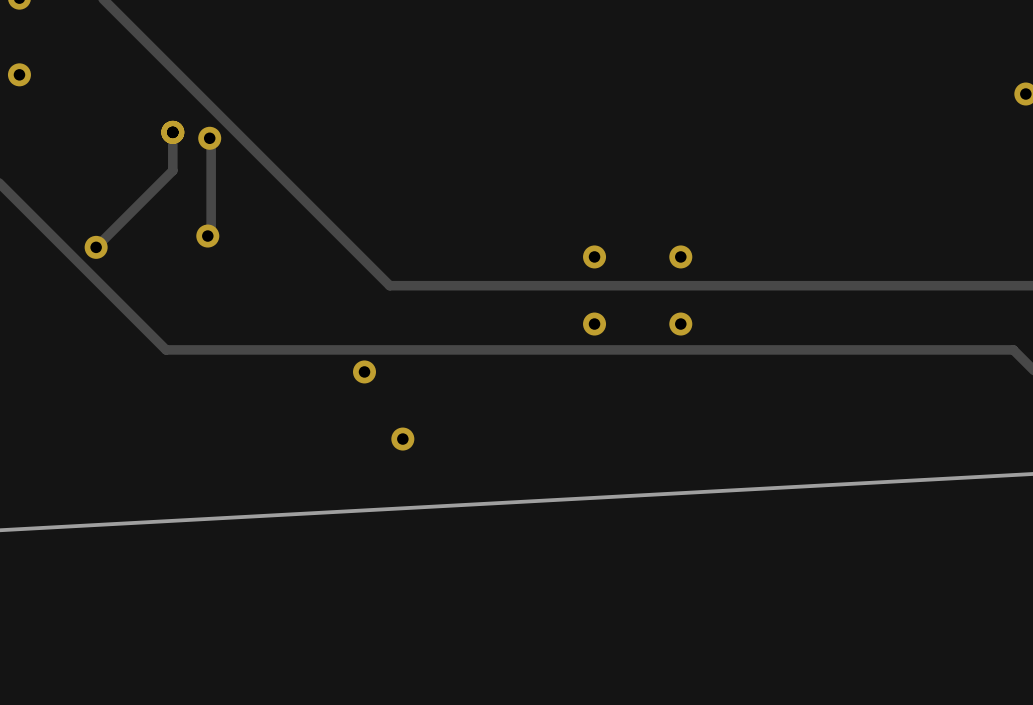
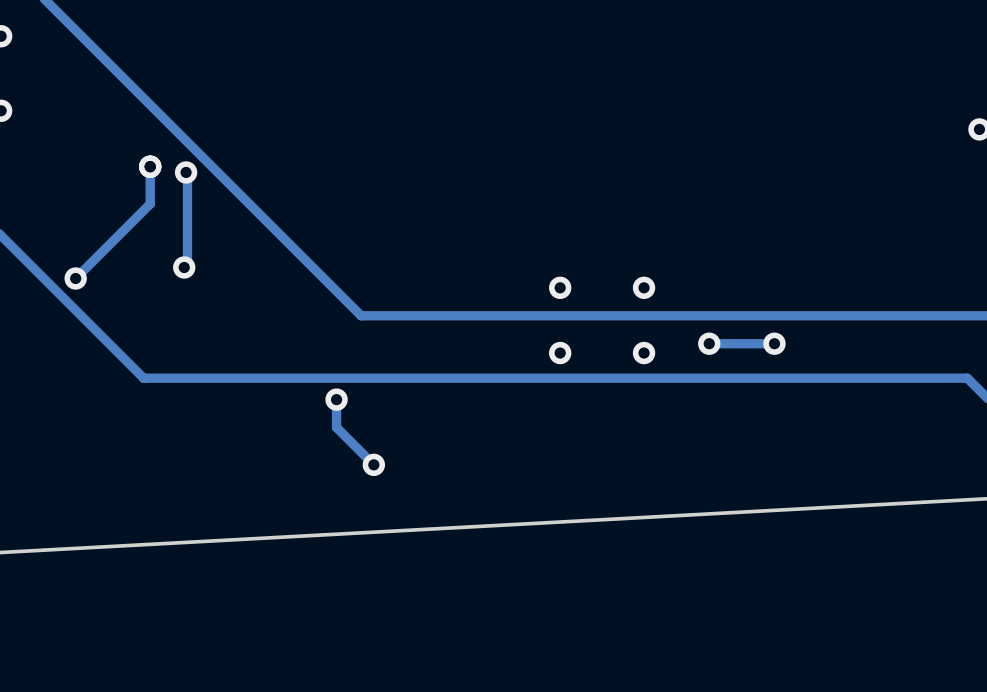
via: none -> (709, 343)
track: none -> (774, 343) (709, 343)
via: none -> (774, 343)
track: none -> (336, 399) (336, 427) (373, 464)

